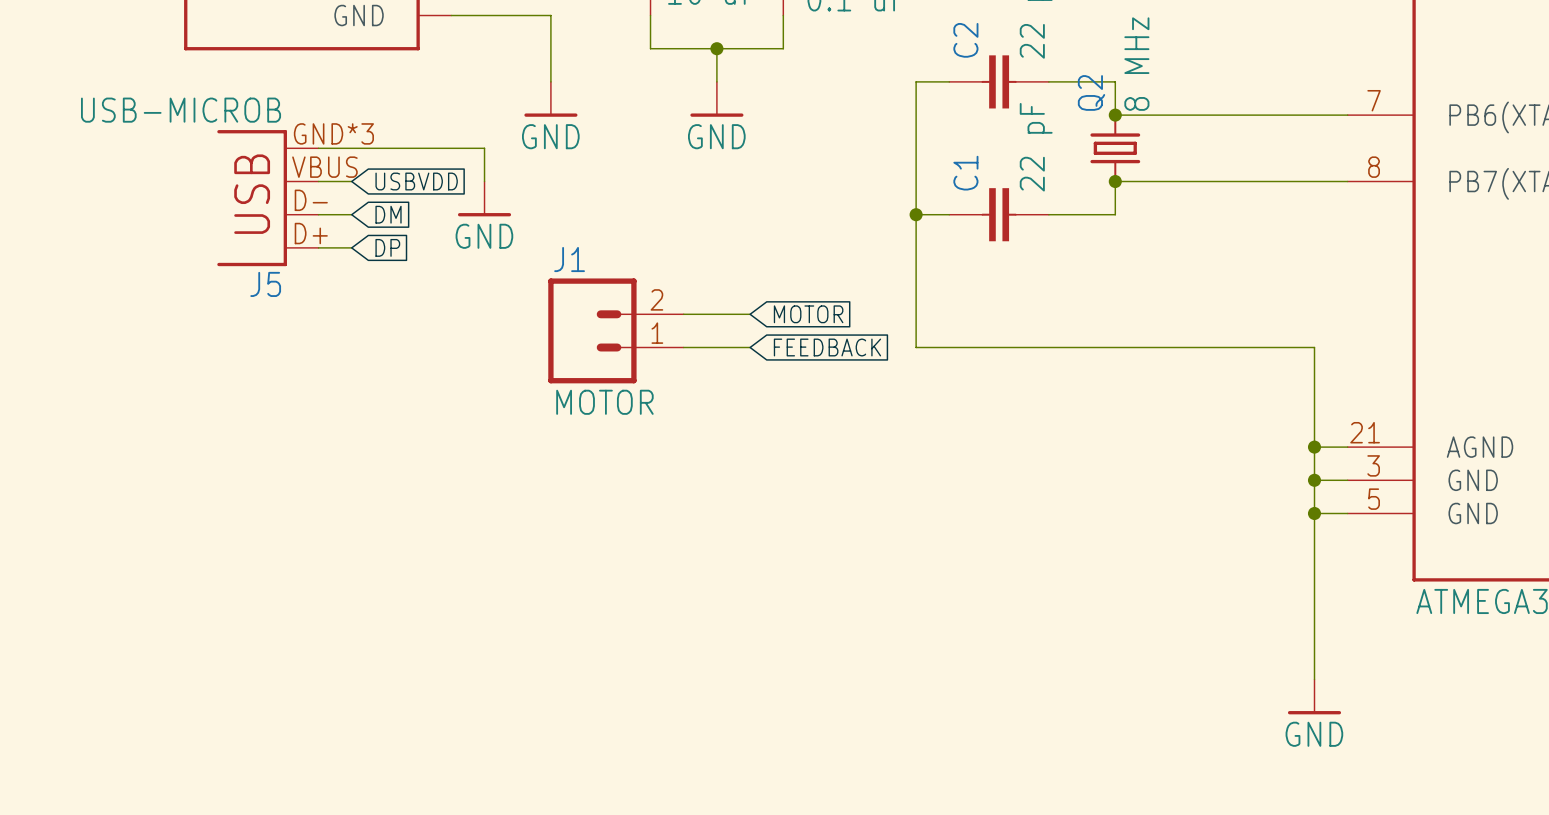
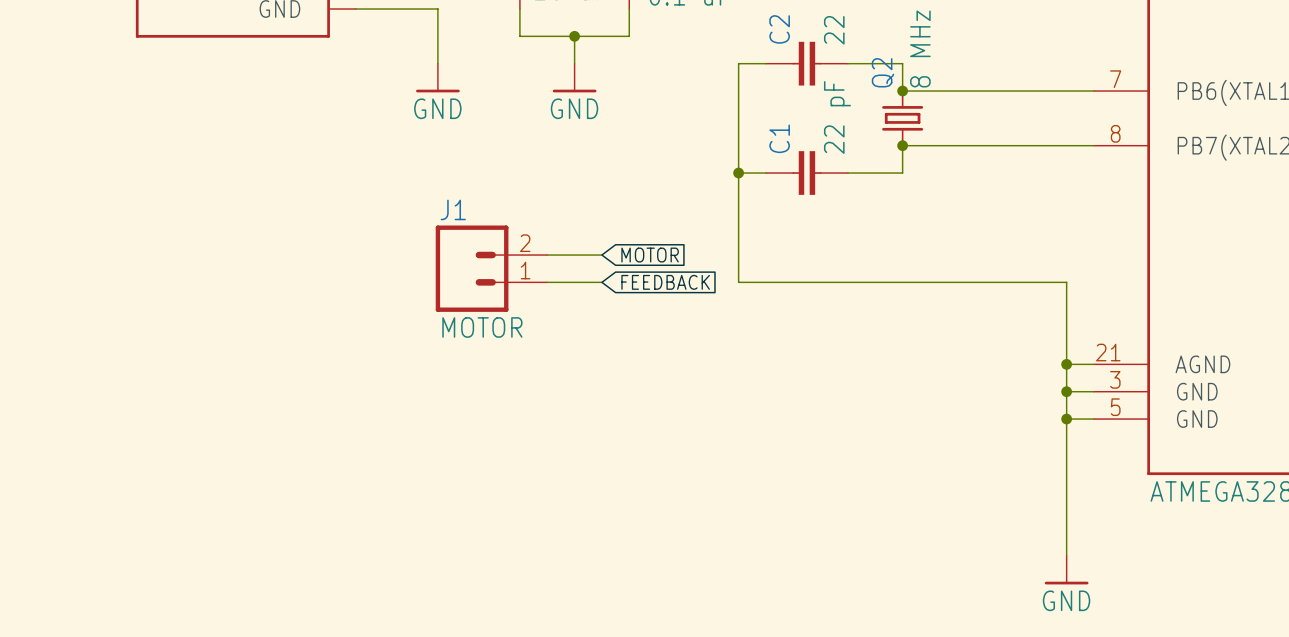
wire: (318, 148) (484, 148) (484, 181) -> none
wire: (318, 181) (351, 181) -> none
global label: USBVDD (416, 181) -> none
J5: USB-MICROB (267, 198) -> none
power symbol: GND (484, 198) -> none
wire: (318, 214) (351, 214) -> none
global label: DM (388, 214) -> none
wire: (318, 247) (351, 247) -> none
global label: DP (387, 247) -> none

